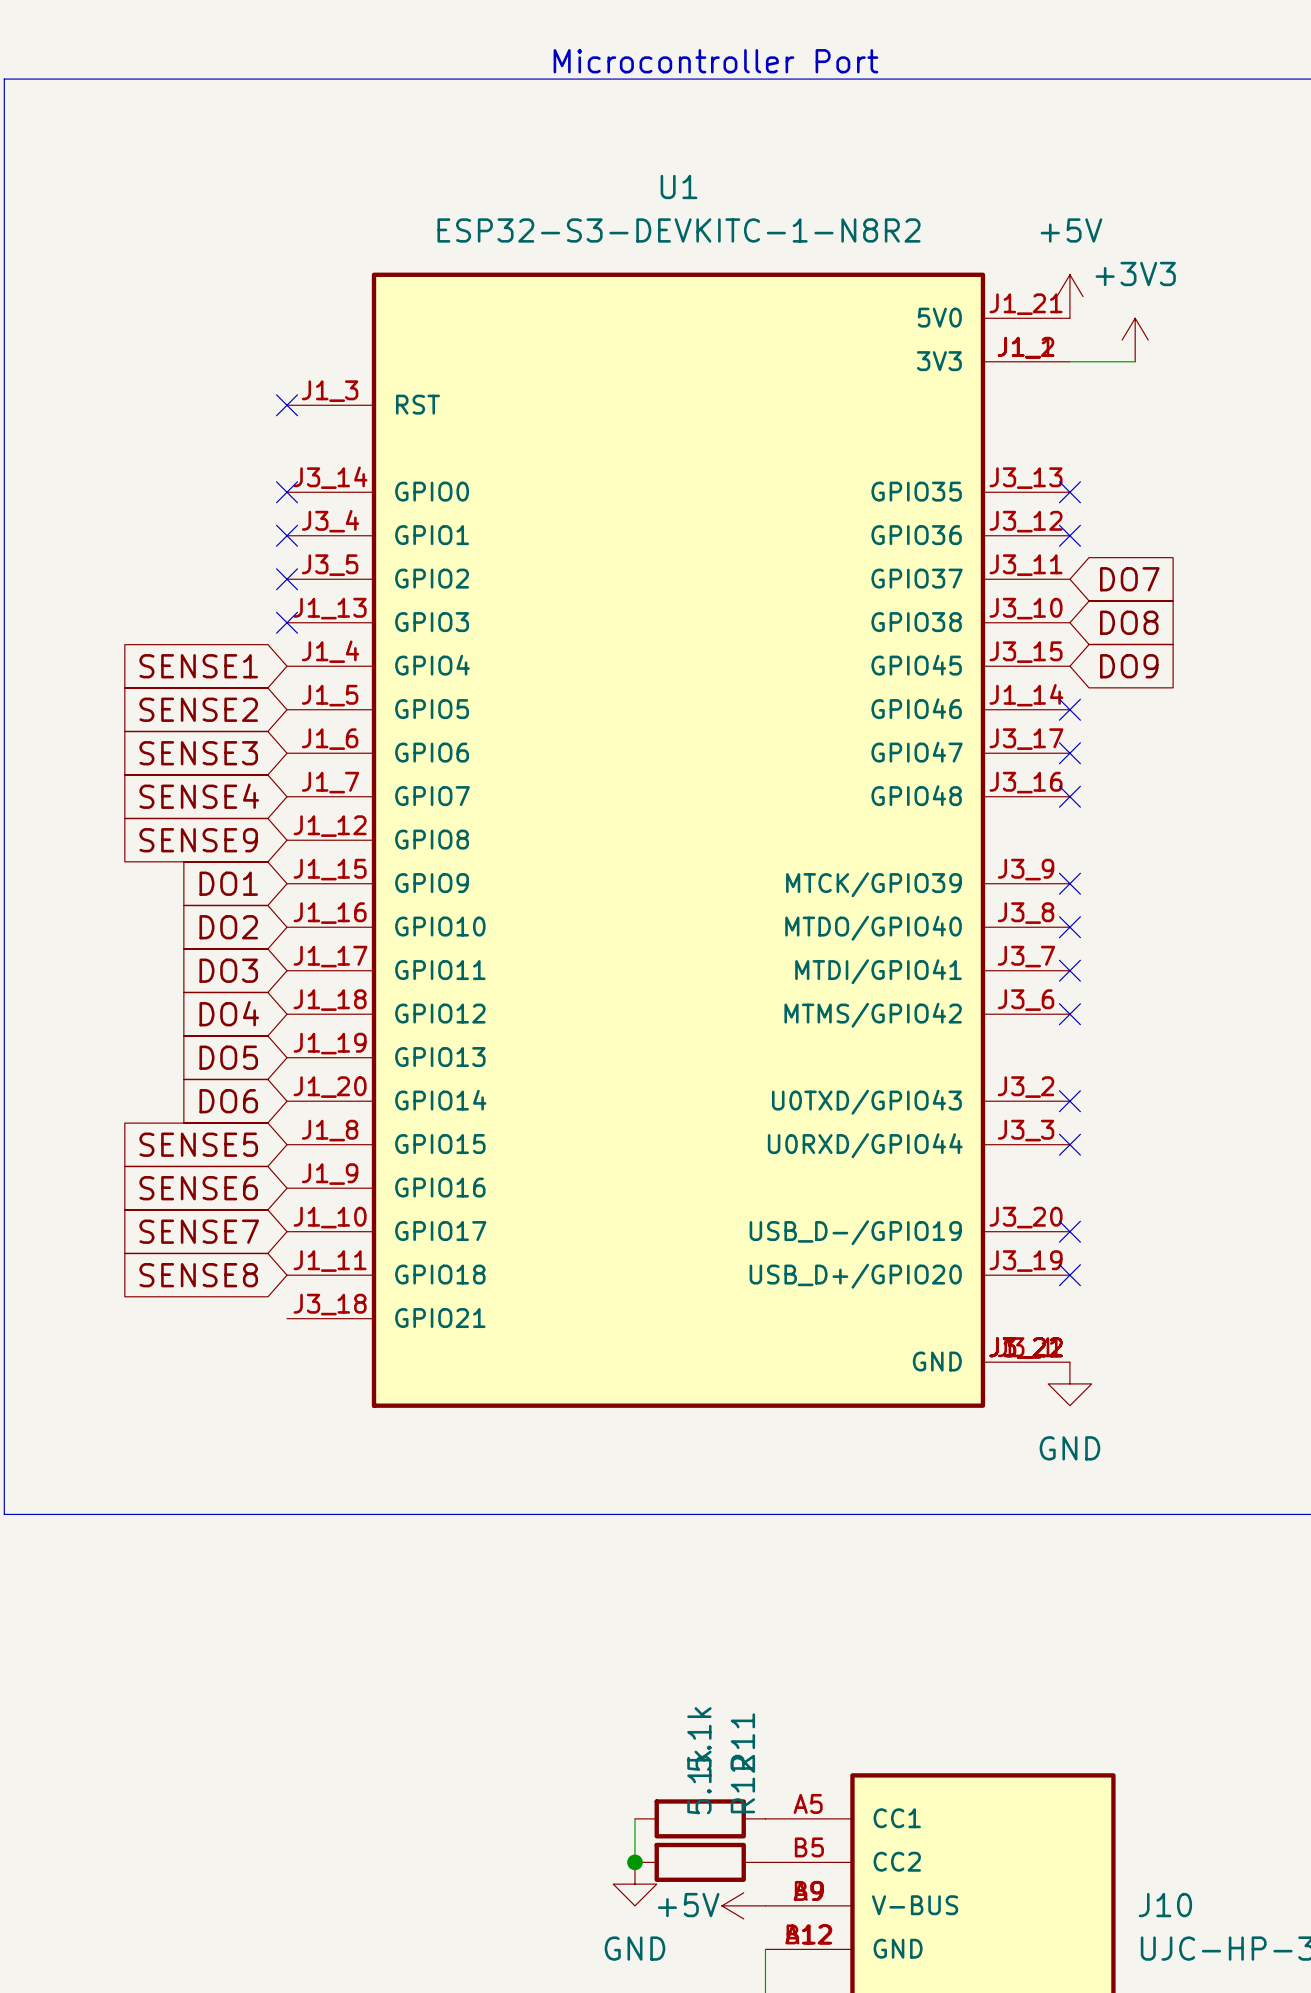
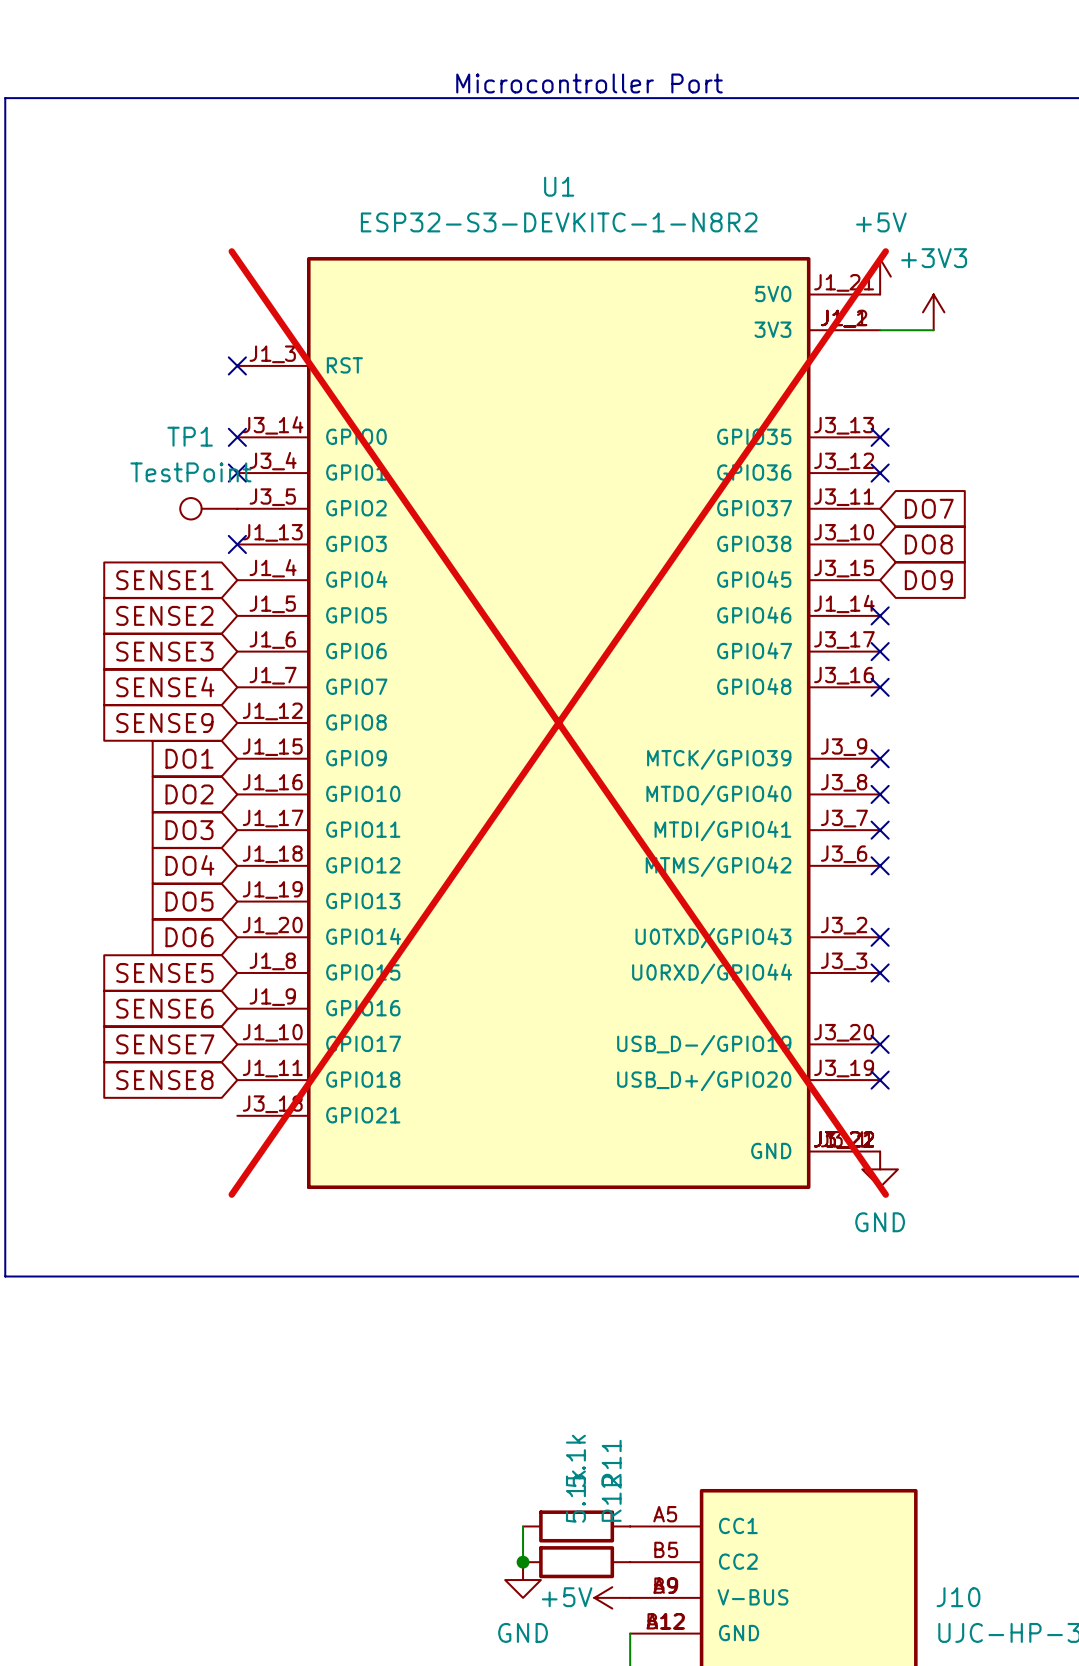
TP1: none -> TestPoint (208, 508)
no-connect mark: (287, 579) -> none
U1 do-not-place cross: none -> (558, 723)

